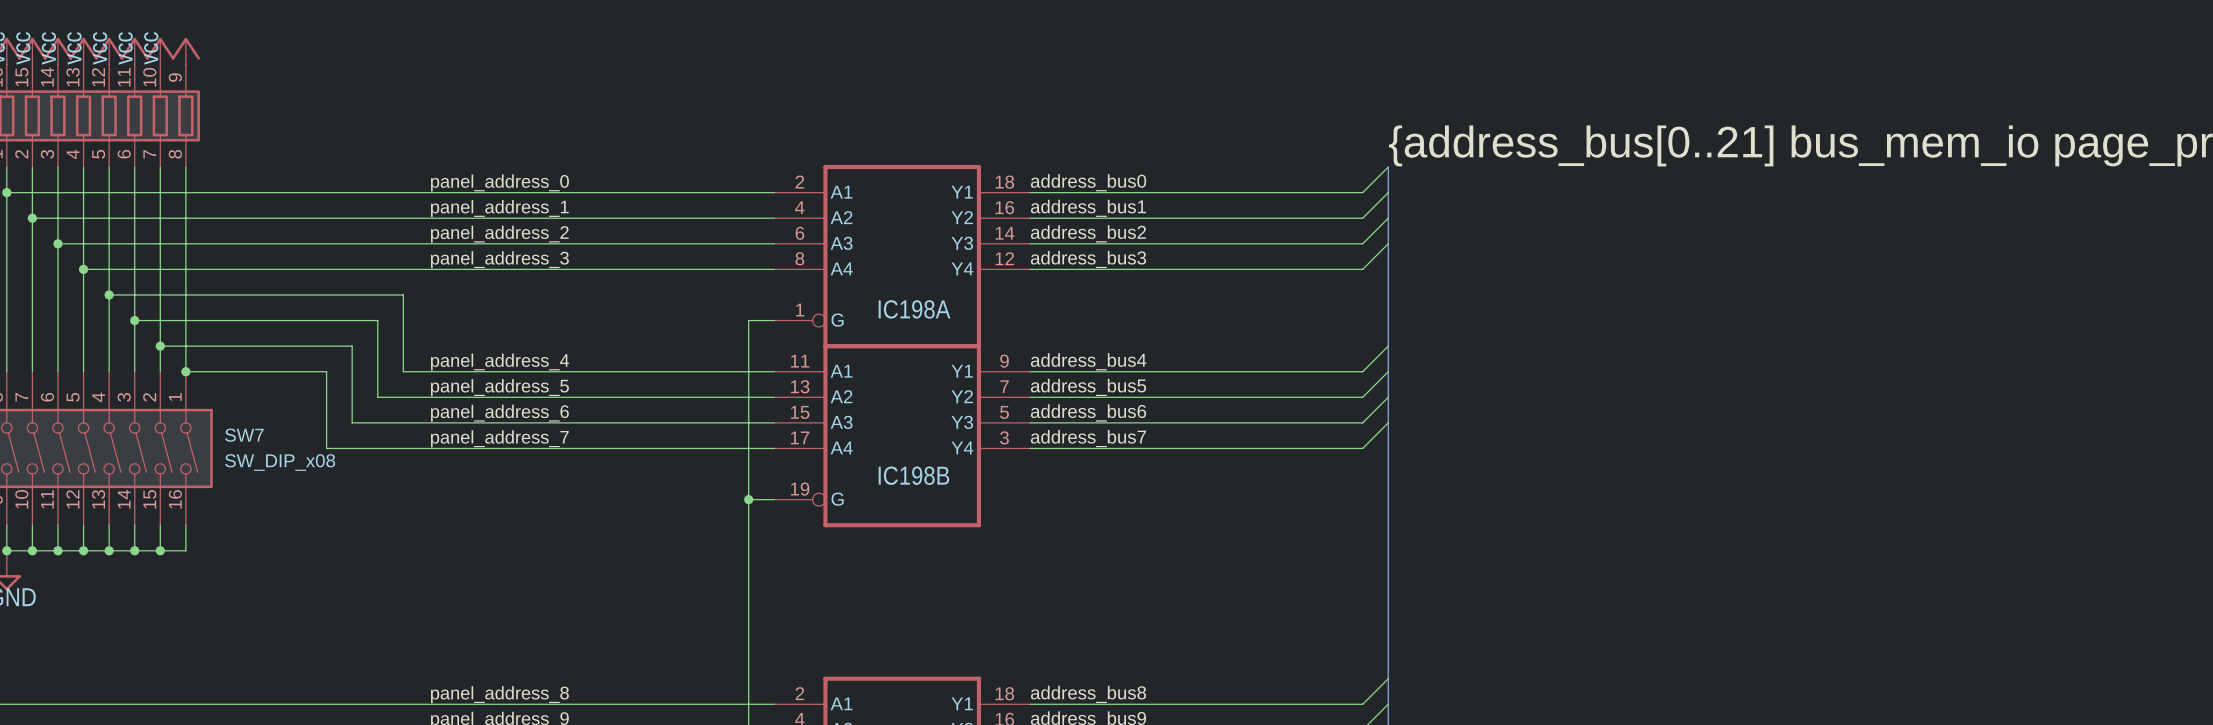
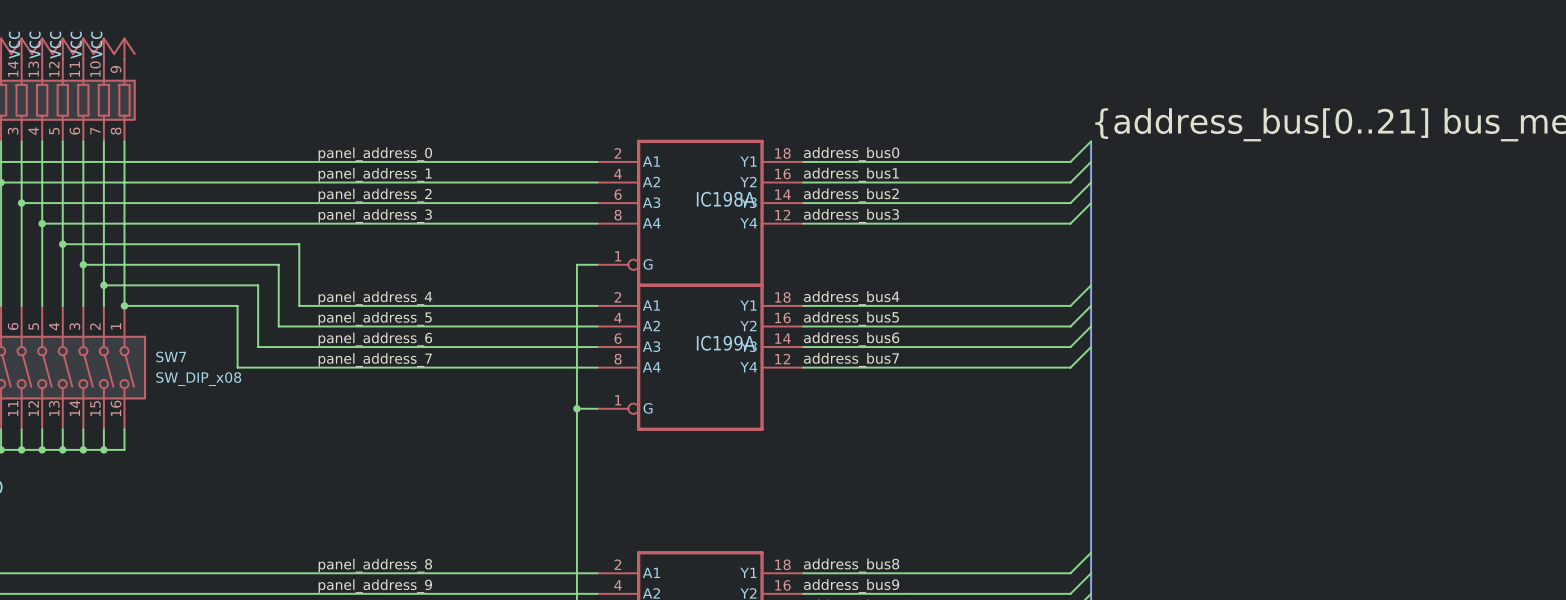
IC198A name position: IC198A (914, 309) -> IC198A (726, 199)
IC198B symbol: [774, 344, 1031, 528] -> [597, 283, 804, 431]
IC198B name: IC198B (913, 475) -> IC199A (726, 343)

